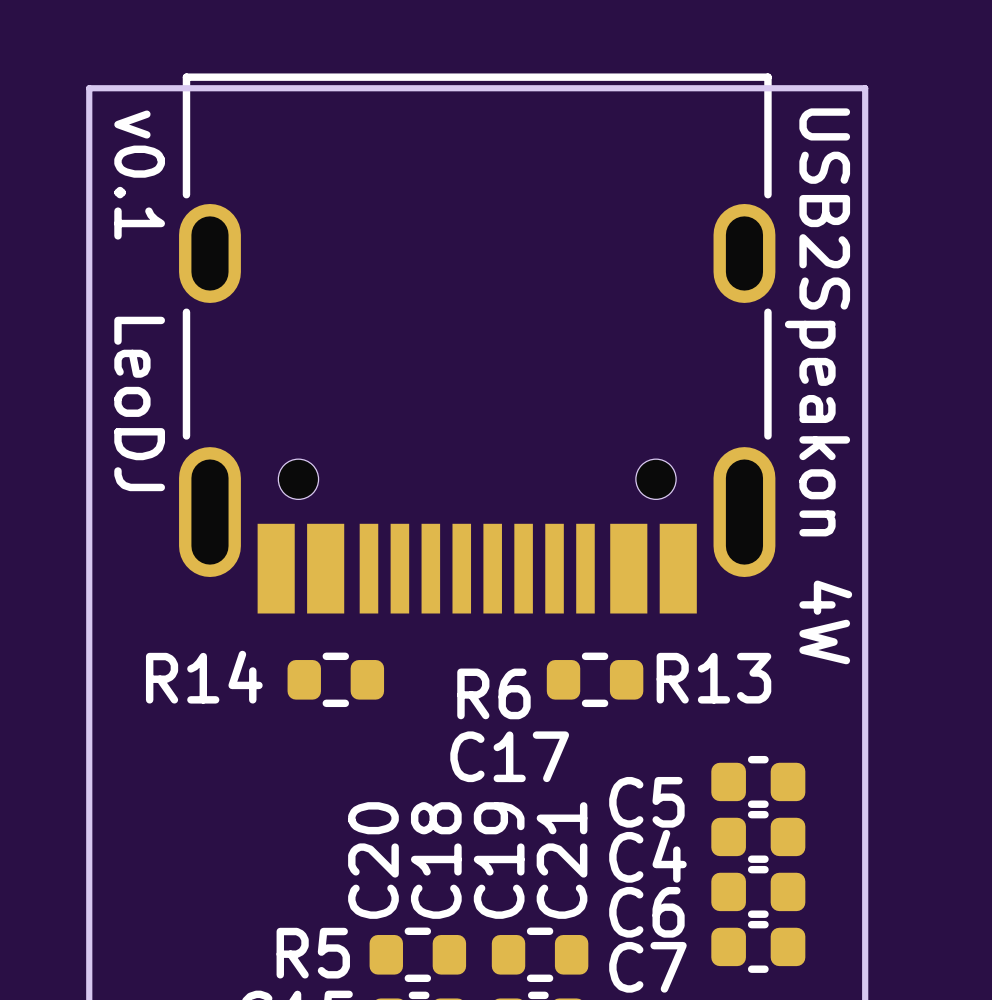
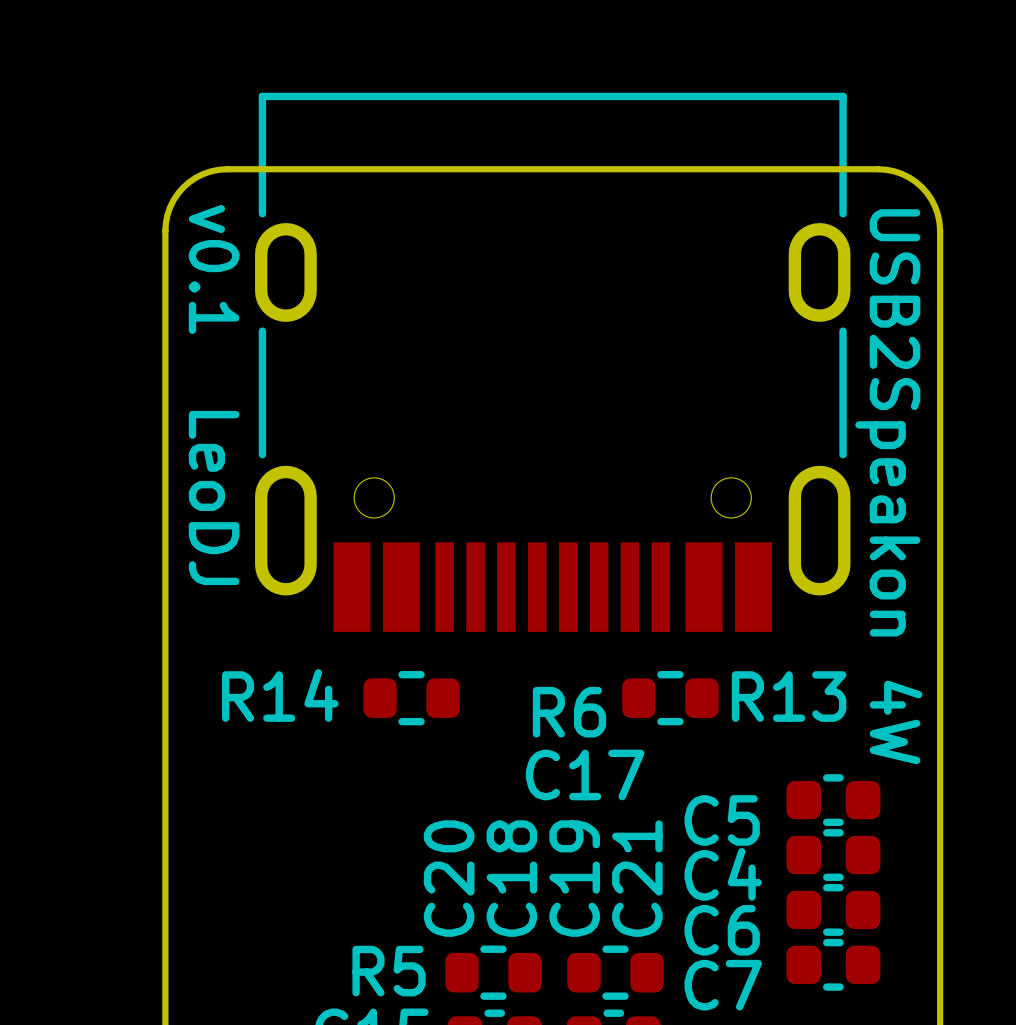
board edge: (89, 211) (89, 88) (865, 88) (865, 211) -> (165, 231) (167, 215) (178, 193) (196, 177) (219, 169) (878, 169) (901, 173) (922, 187) (935, 207) (940, 231)
text position: v0.1 LeoDJ (139, 300) -> v0.1 LeoDJ (214, 395)
text position: USB2Speakon 4W (818, 386) -> USB2Speakon 4W (888, 486)

